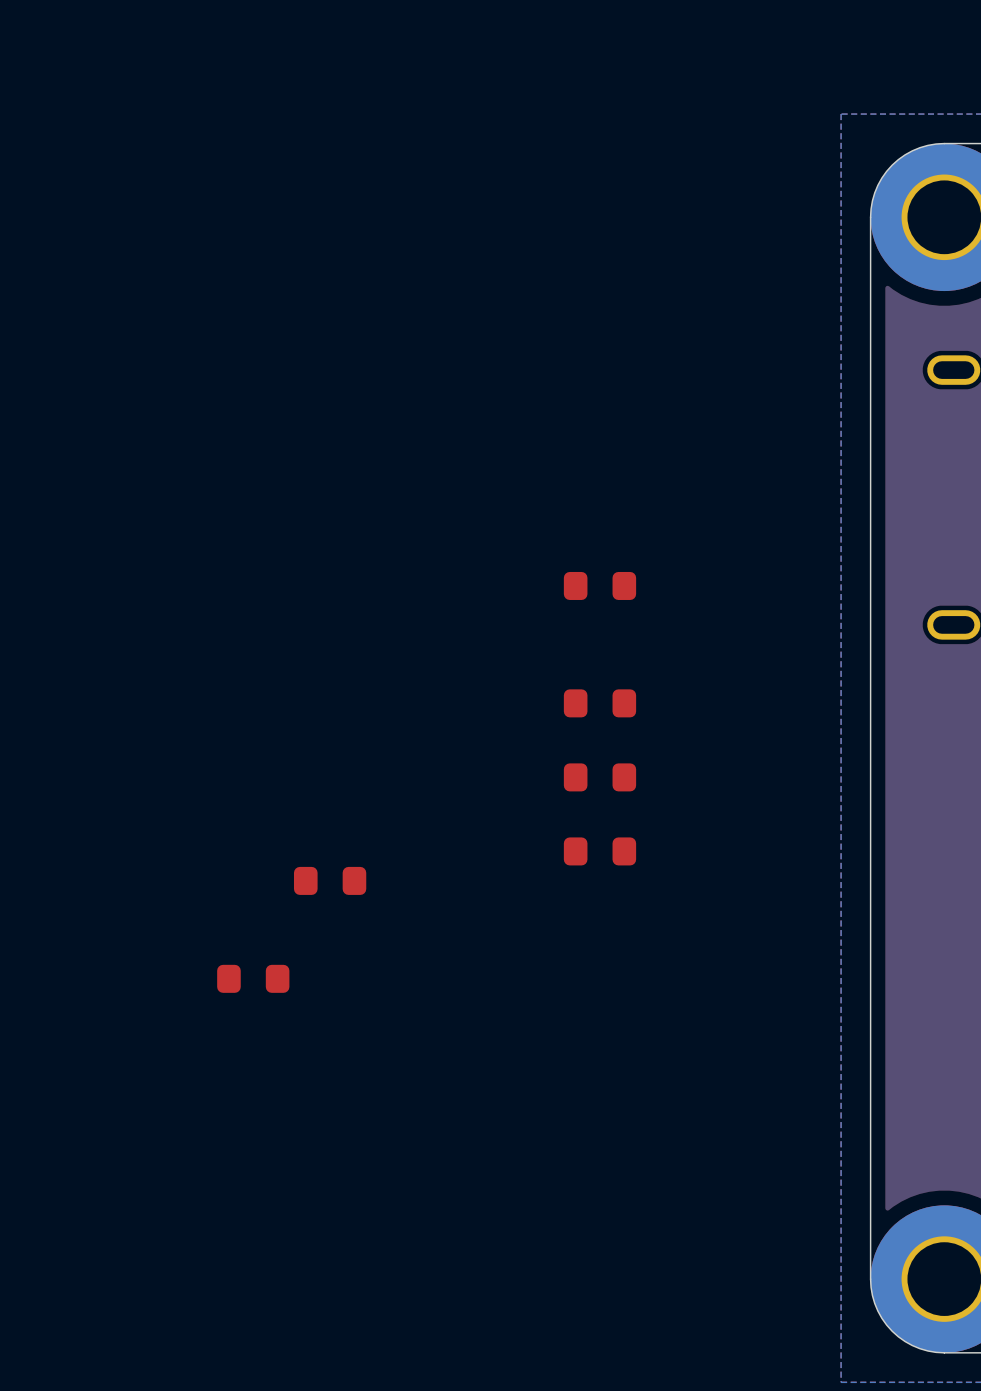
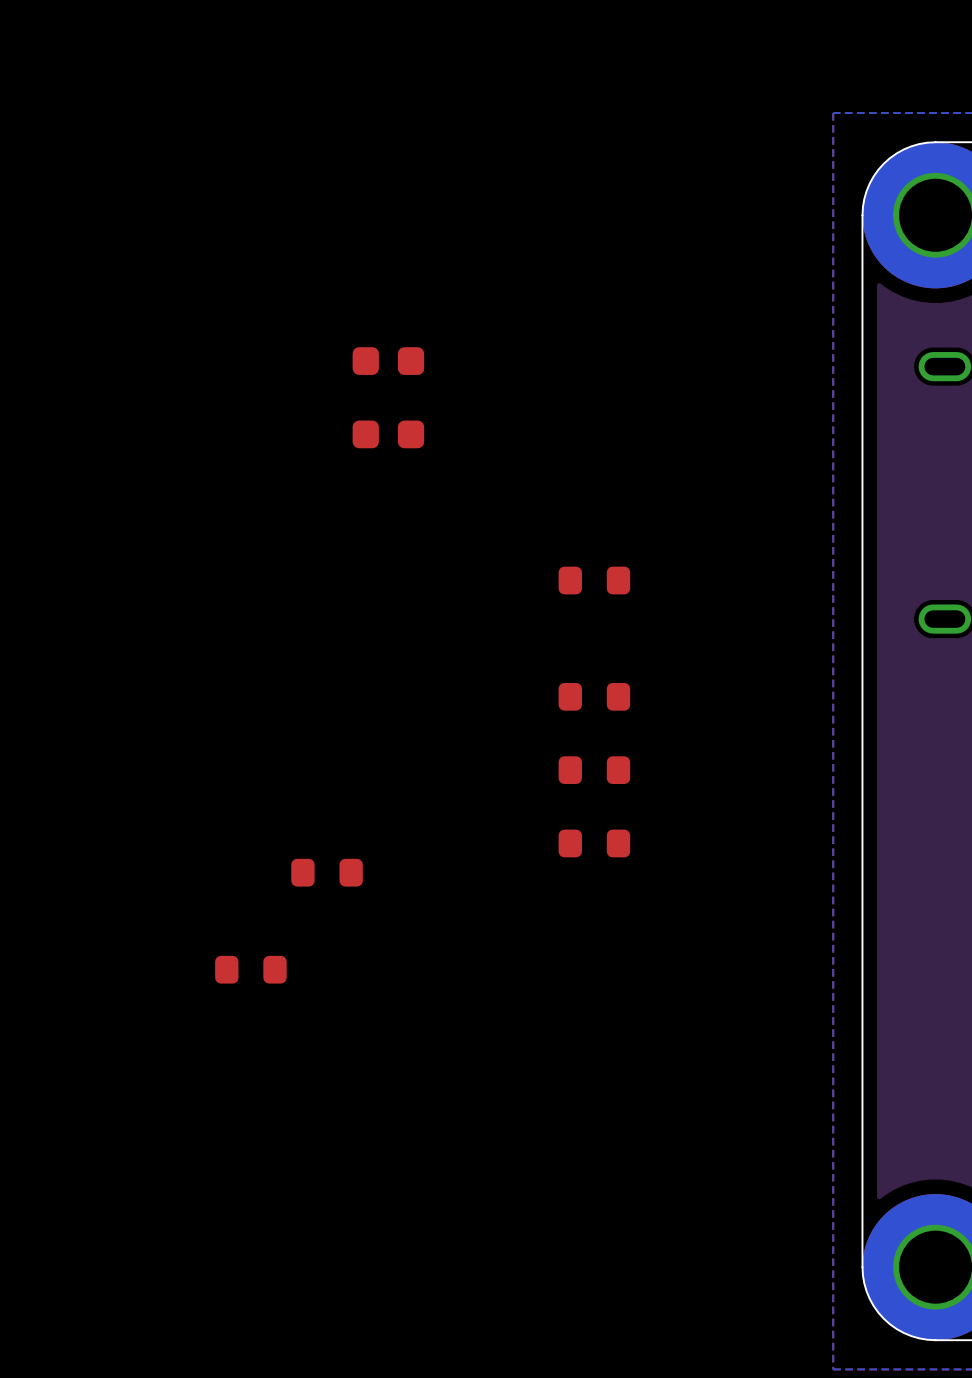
part: none -> (388, 361)
part: none -> (388, 434)

